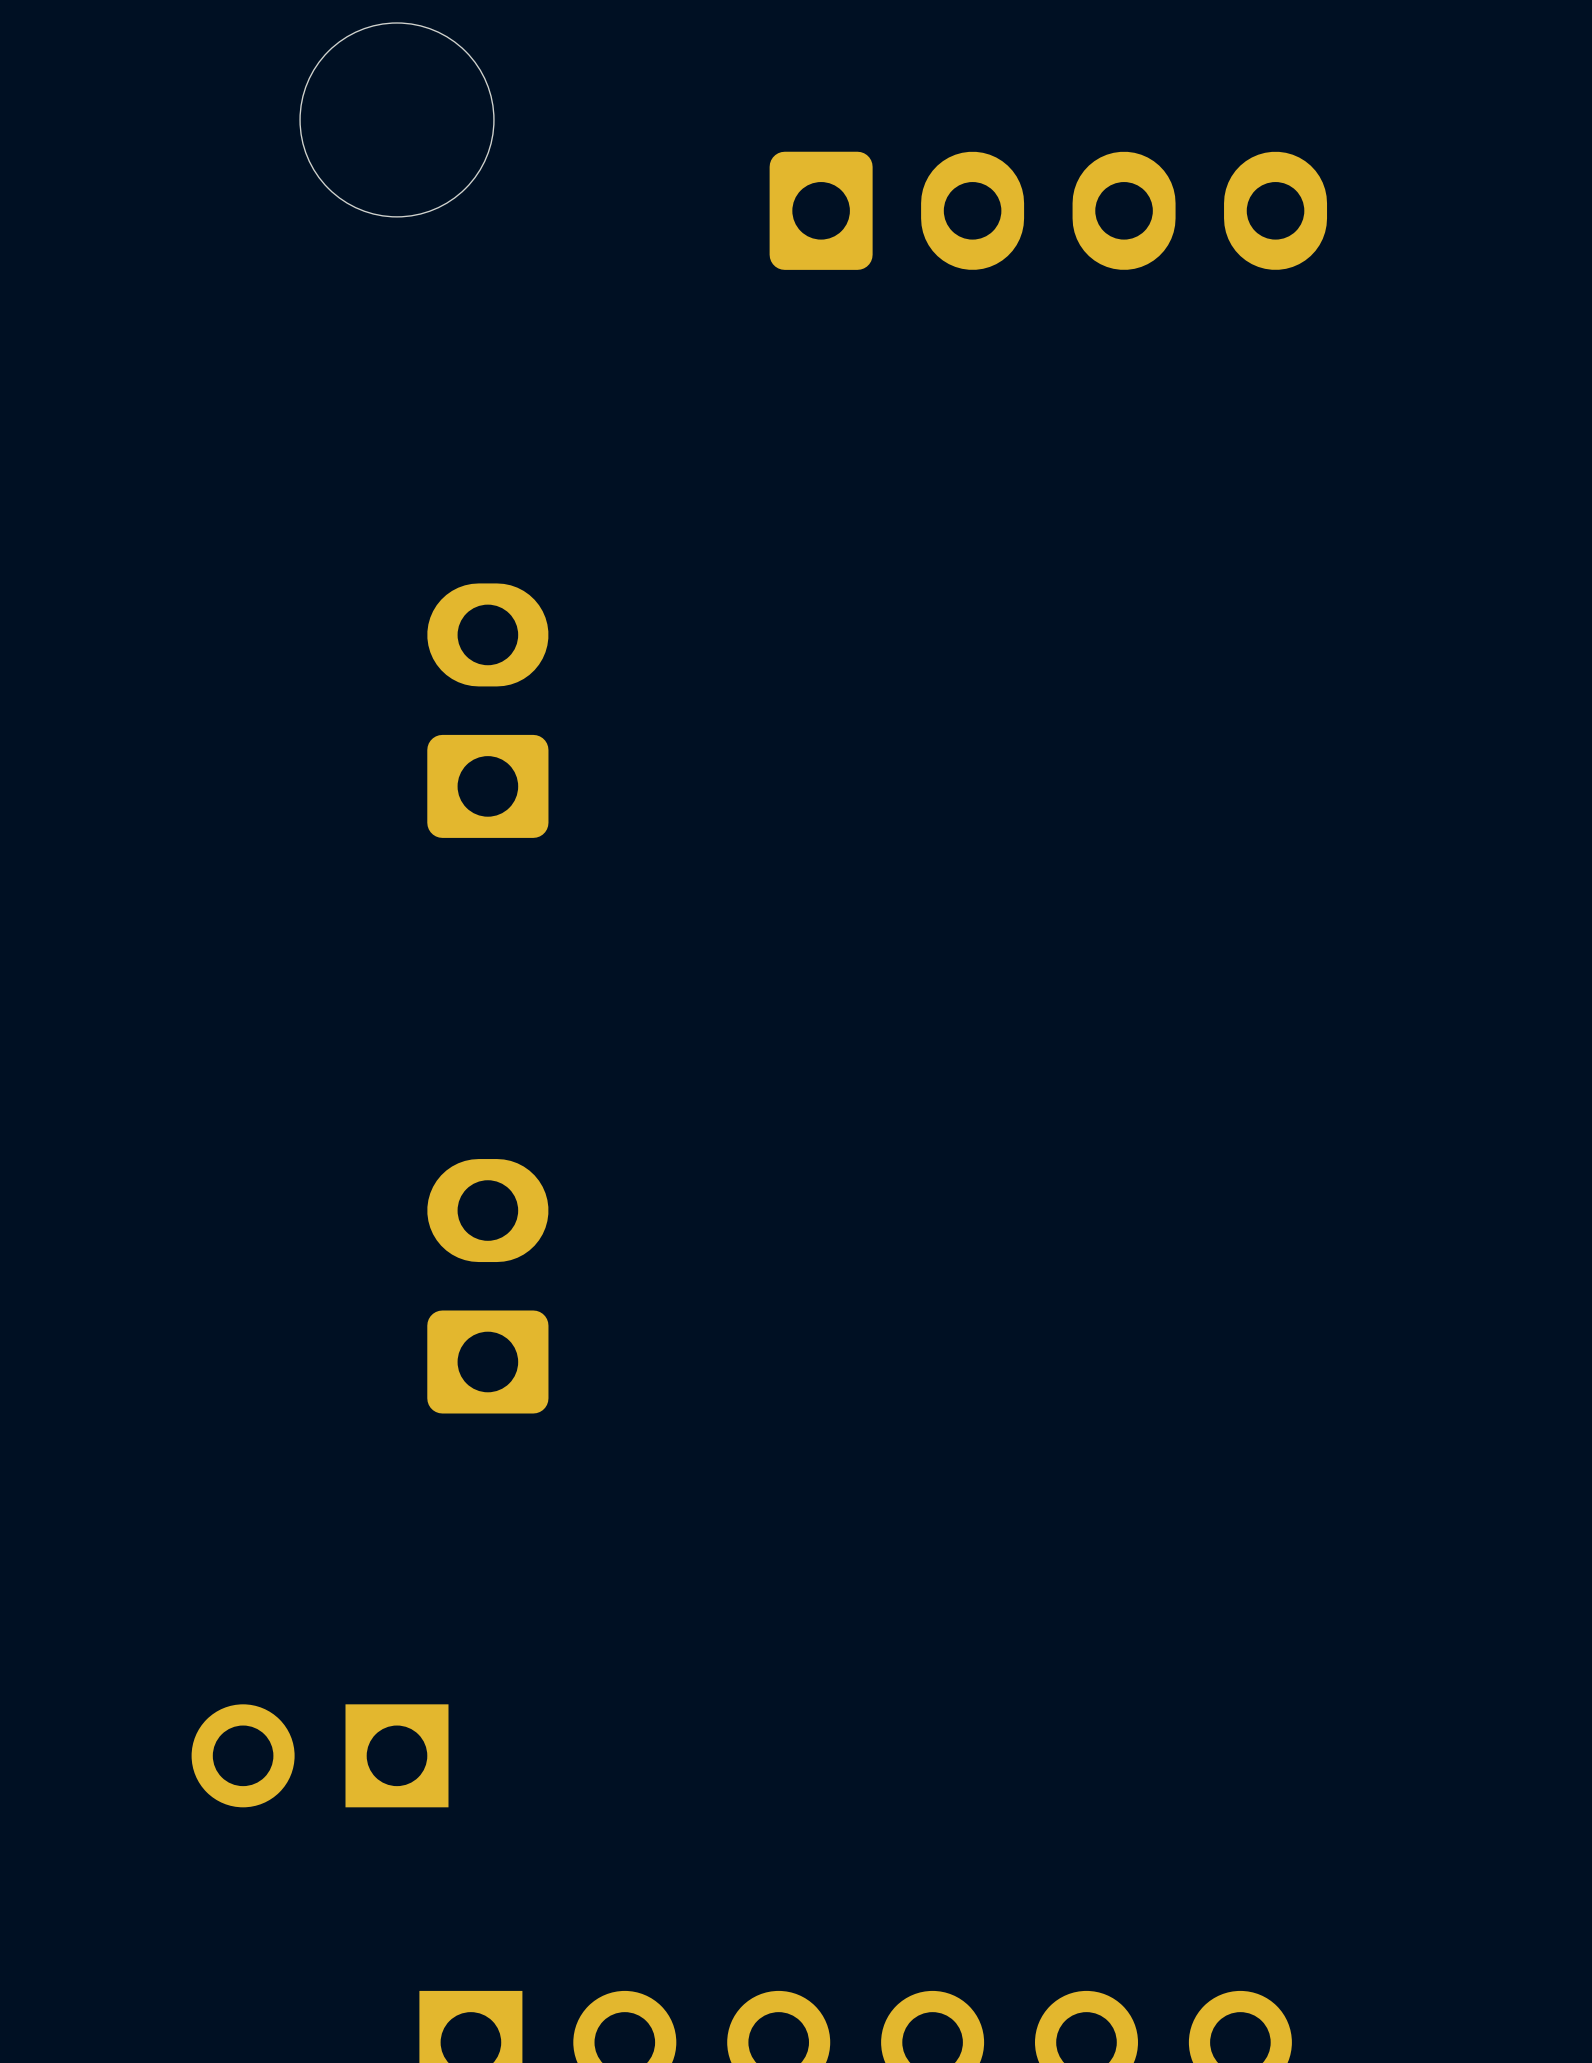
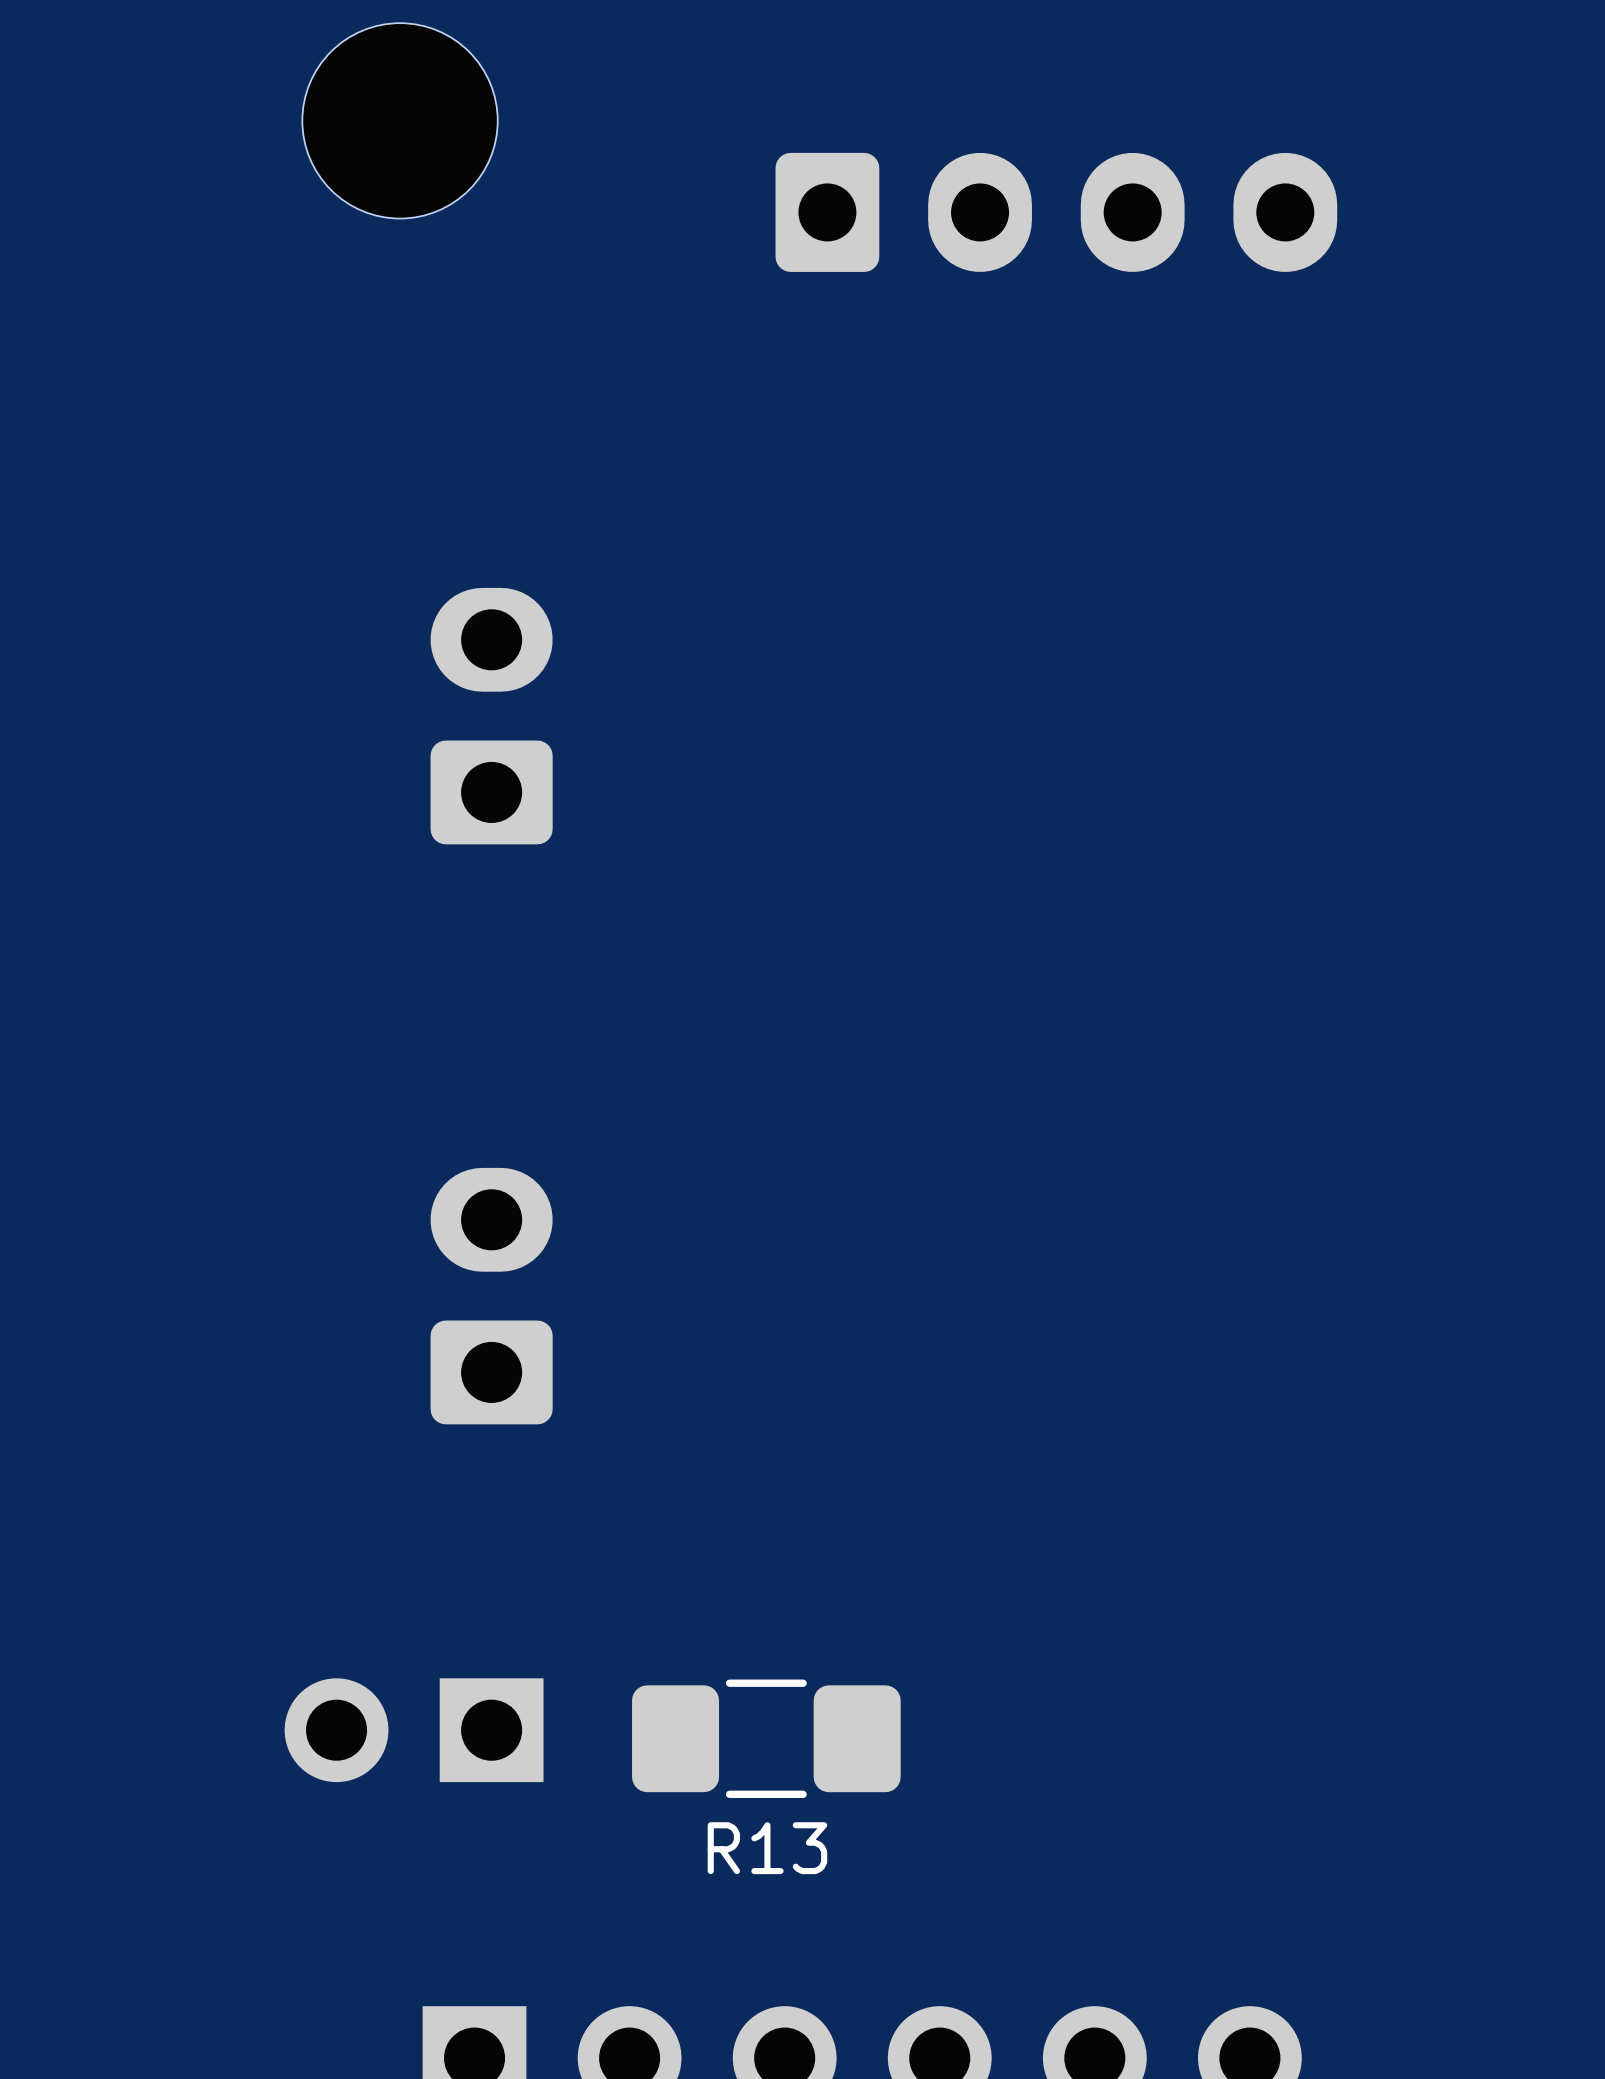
R13: none -> (766, 1738)
part position: (320, 1755) -> (414, 1730)

